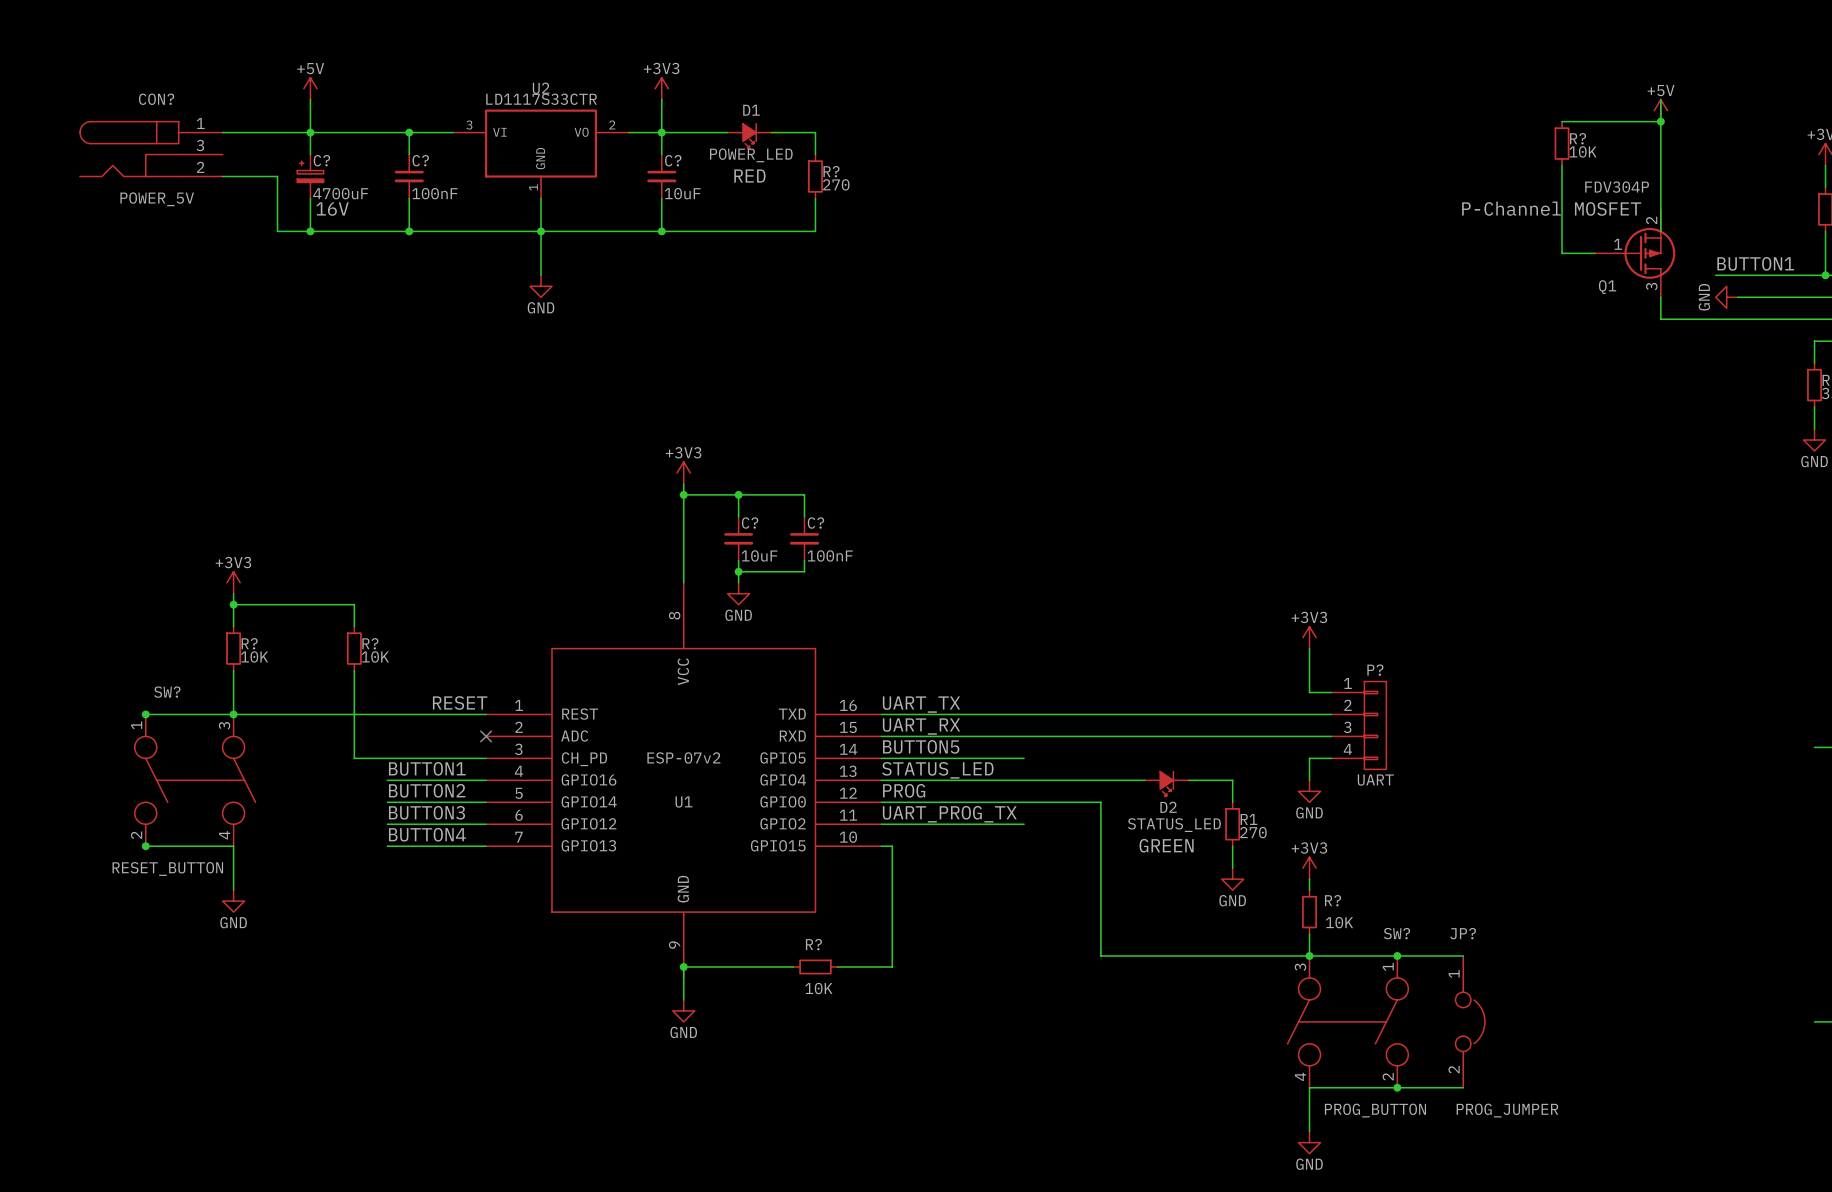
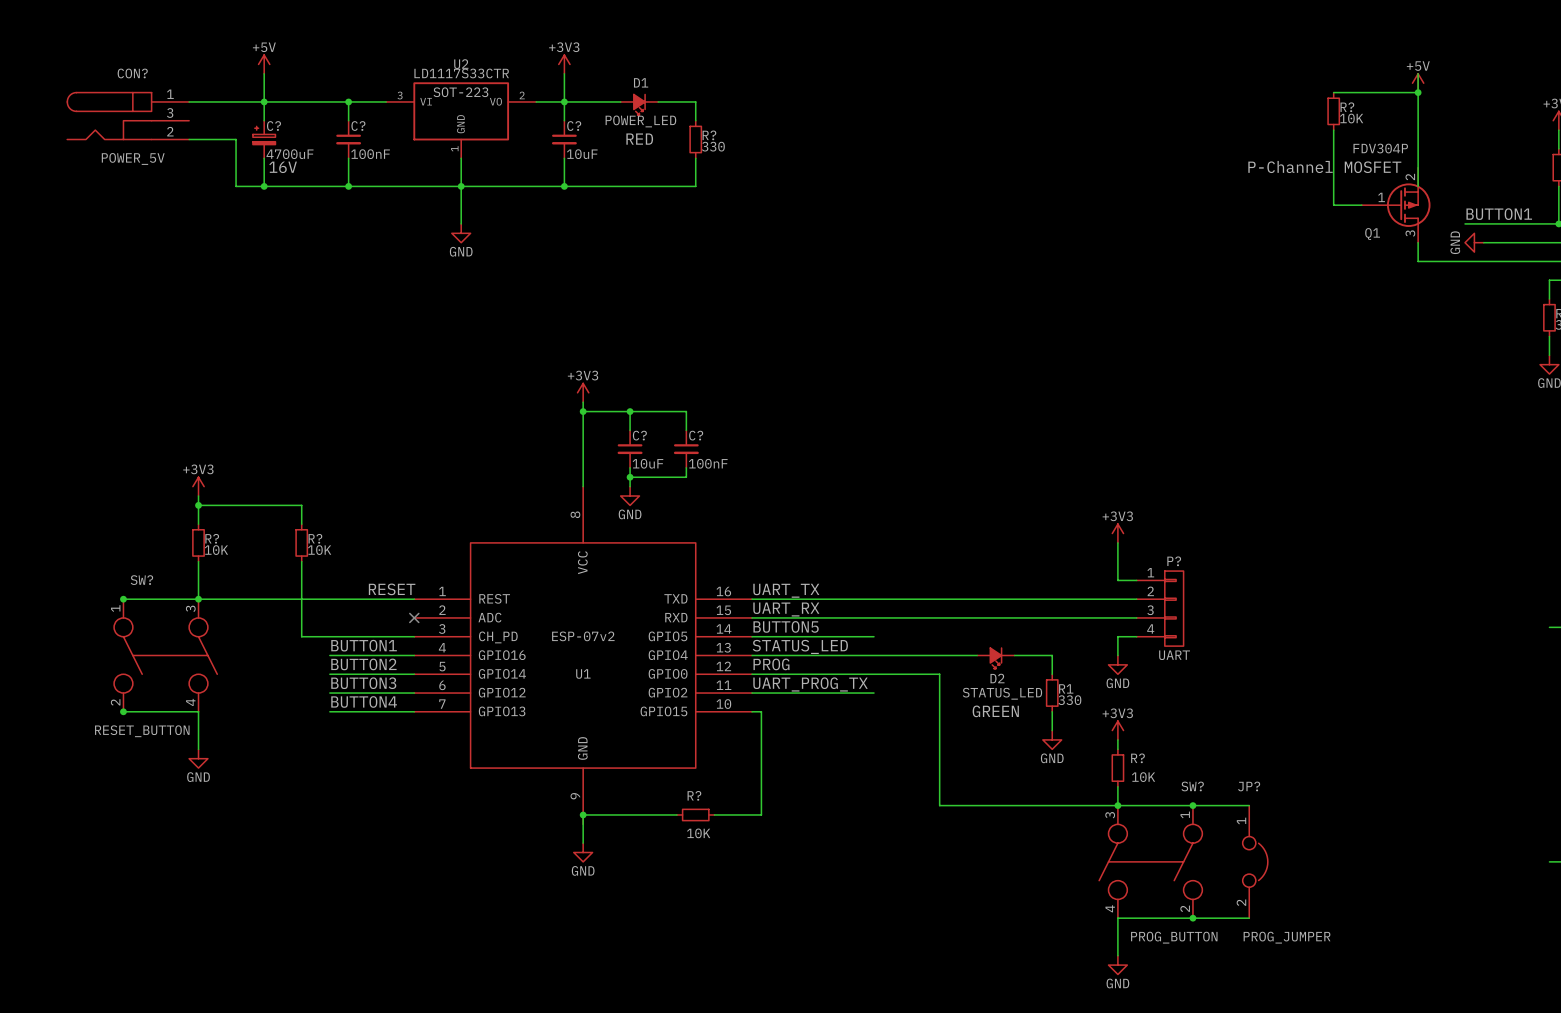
U2 text: none -> SOT-223 (460, 92)
R? value: 270 (836, 184) -> 330 (713, 146)
R1 value: 270 (1253, 832) -> 330 (1069, 700)

